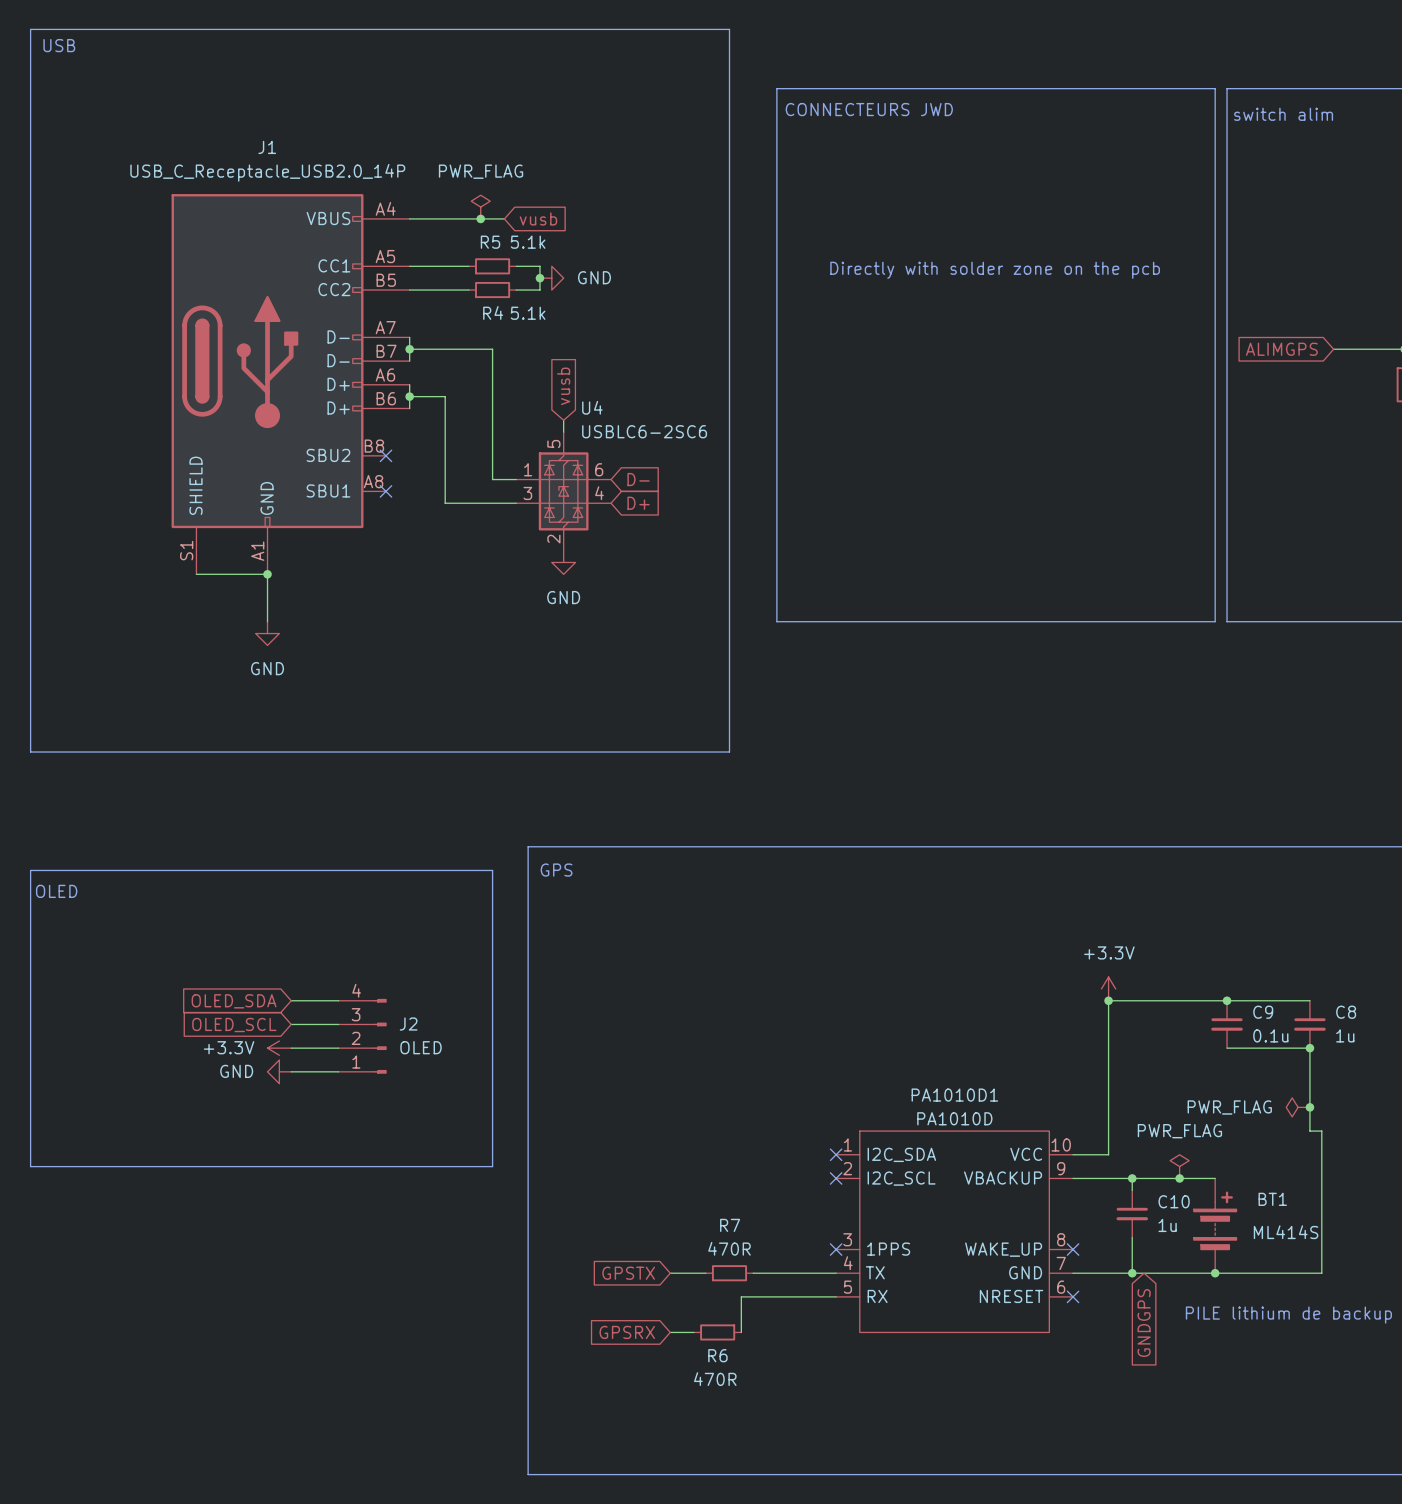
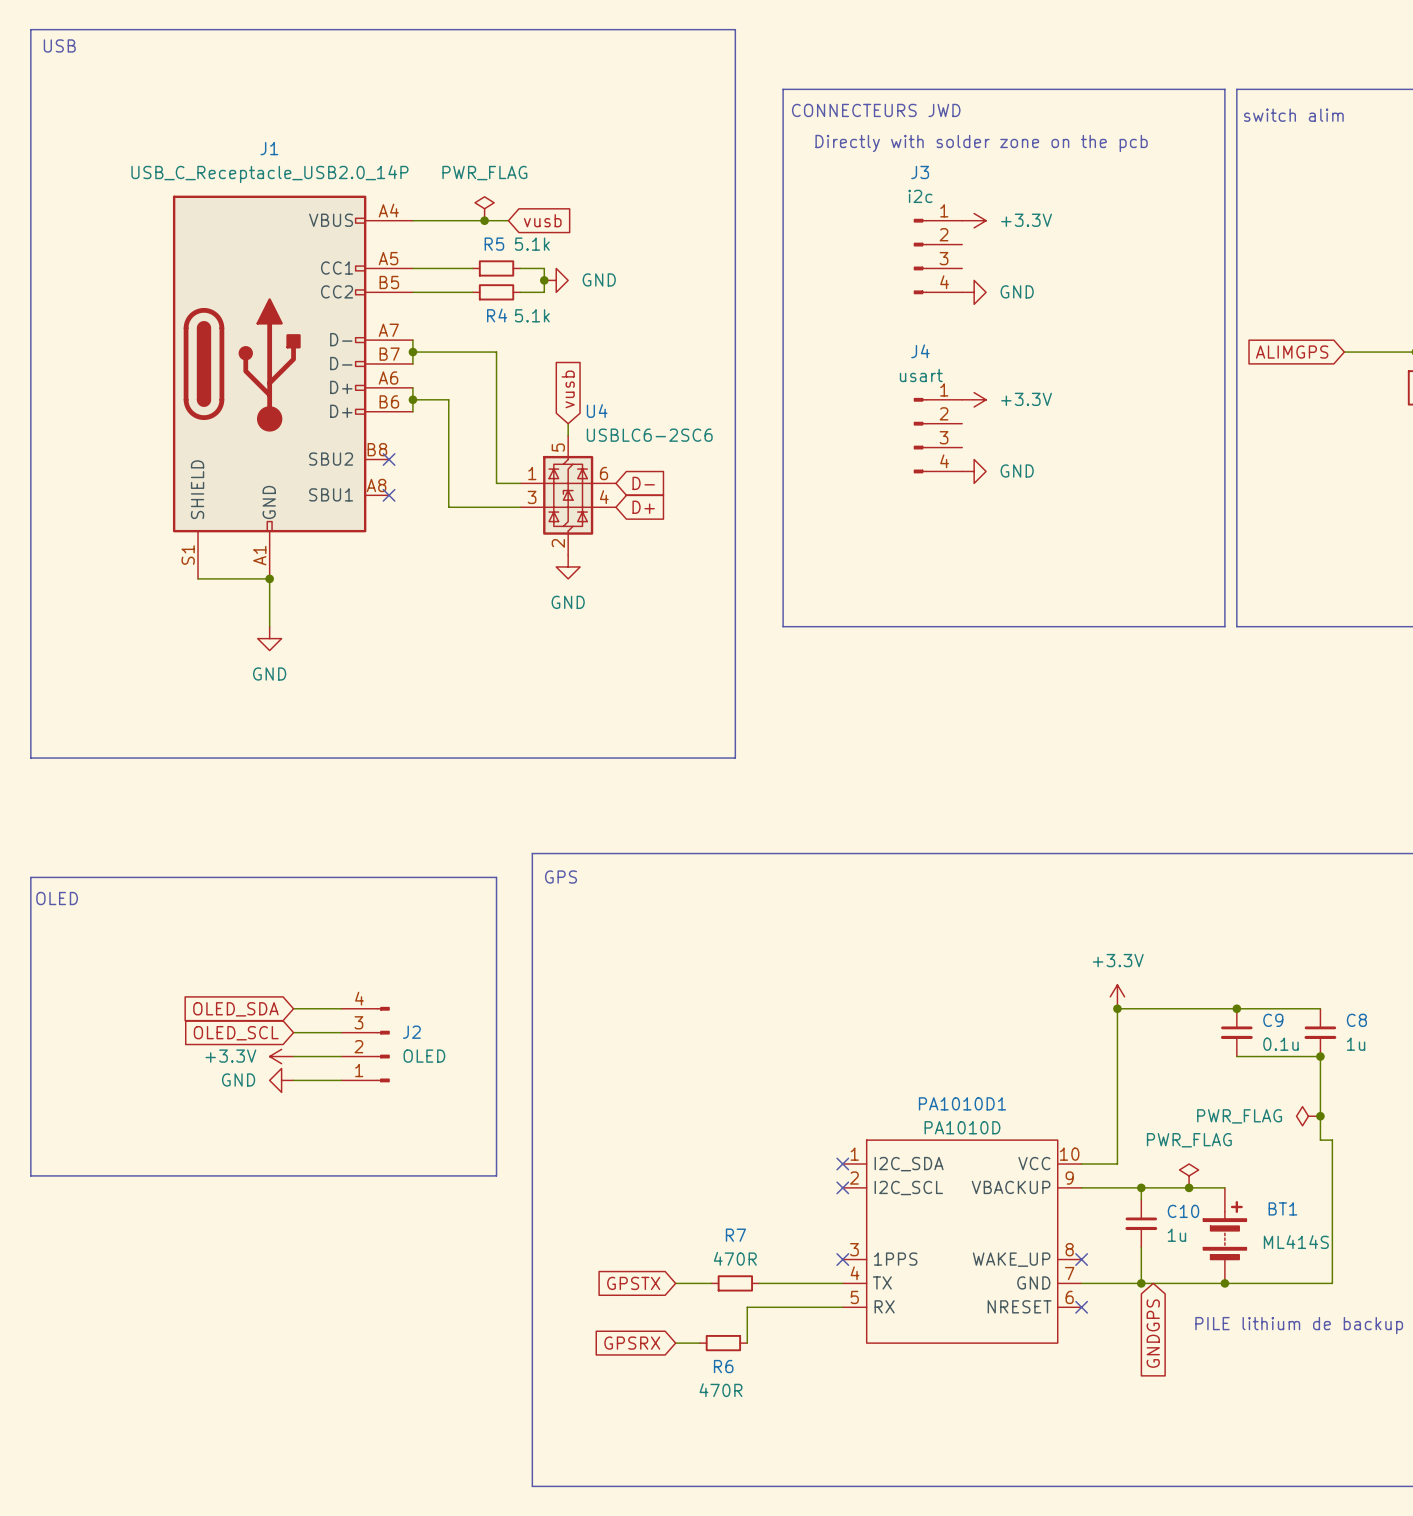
power symbol: none -> +3.3V (974, 220)
J3: none -> i2c (937, 256)
text position: Directly with solder zone on the pcb (995, 270) -> Directly with solder zone on the pcb (981, 143)
power symbol: none -> GND (974, 292)
power symbol: none -> +3.3V (974, 399)
J4: none -> usart (937, 435)
power symbol: none -> GND (974, 471)

